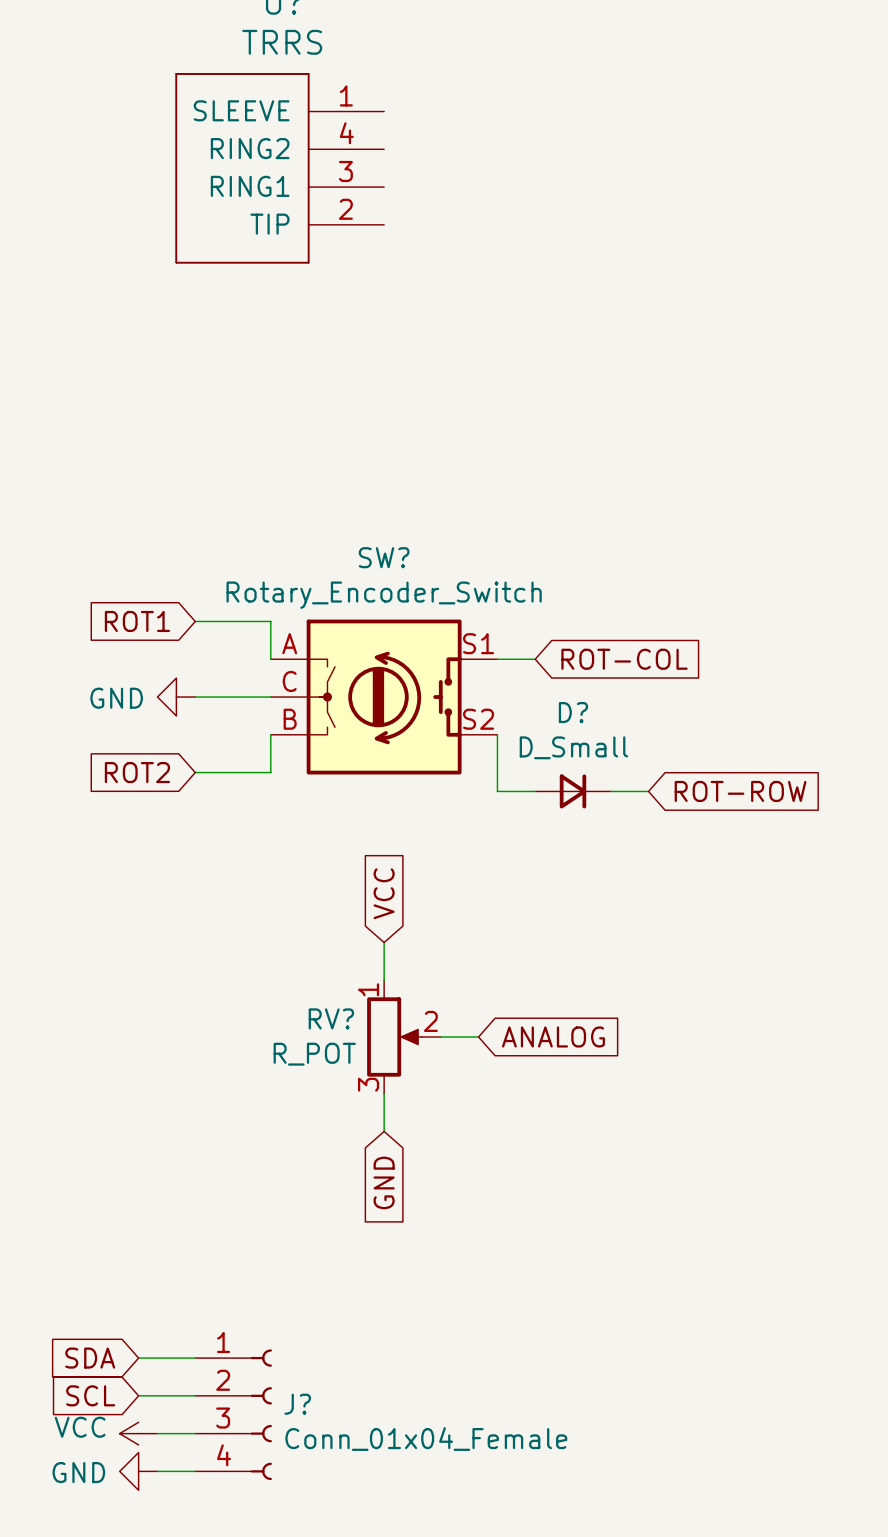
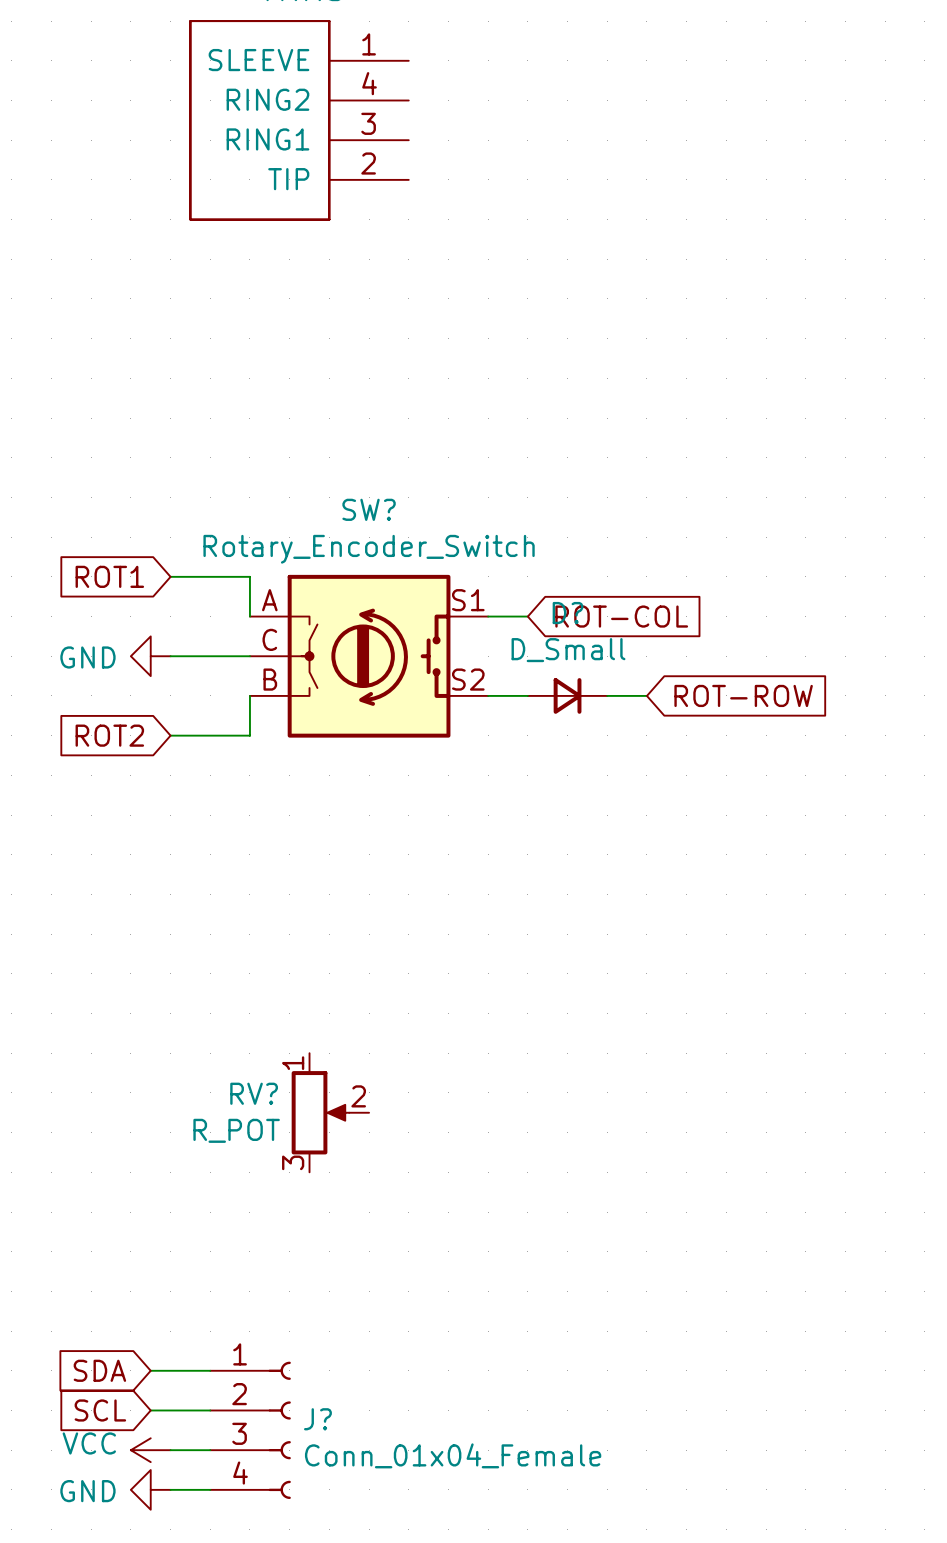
global label position: ROT1 (137, 621) -> ROT1 (109, 576)
wire: (195, 621) (270, 621) (270, 659) -> (170, 576) (249, 576) (249, 616)
wire: (497, 659) (535, 659) -> (488, 616) (527, 616)
global label position: ROT-COL (624, 659) -> ROT-COL (621, 616)
power symbol position: GND (176, 697) -> GND (150, 656)
wire: (195, 697) (270, 697) -> (170, 656) (249, 656)
SW? position: (384, 697) -> (369, 656)
wire: (270, 734) (270, 772) (195, 772) -> (249, 695) (249, 735) (170, 735)
wire: (497, 734) (497, 791) (535, 791) -> none
global label position: ROT2 (137, 772) -> ROT2 (109, 735)
D? position: (572, 791) -> (567, 695)
wire: (610, 791) (648, 791) -> (607, 695) (646, 695)
global label position: ROT-ROW (740, 791) -> ROT-ROW (743, 695)
global label: VCC (384, 893) -> none
wire: (384, 942) (384, 980) -> none
RV? position: (403, 1036) -> (330, 1112)
wire: (440, 1036) (478, 1036) -> (488, 695) (527, 695)
global label: ANALOG (553, 1036) -> none
wire: (384, 1093) (384, 1131) -> none
global label: GND (384, 1182) -> none

